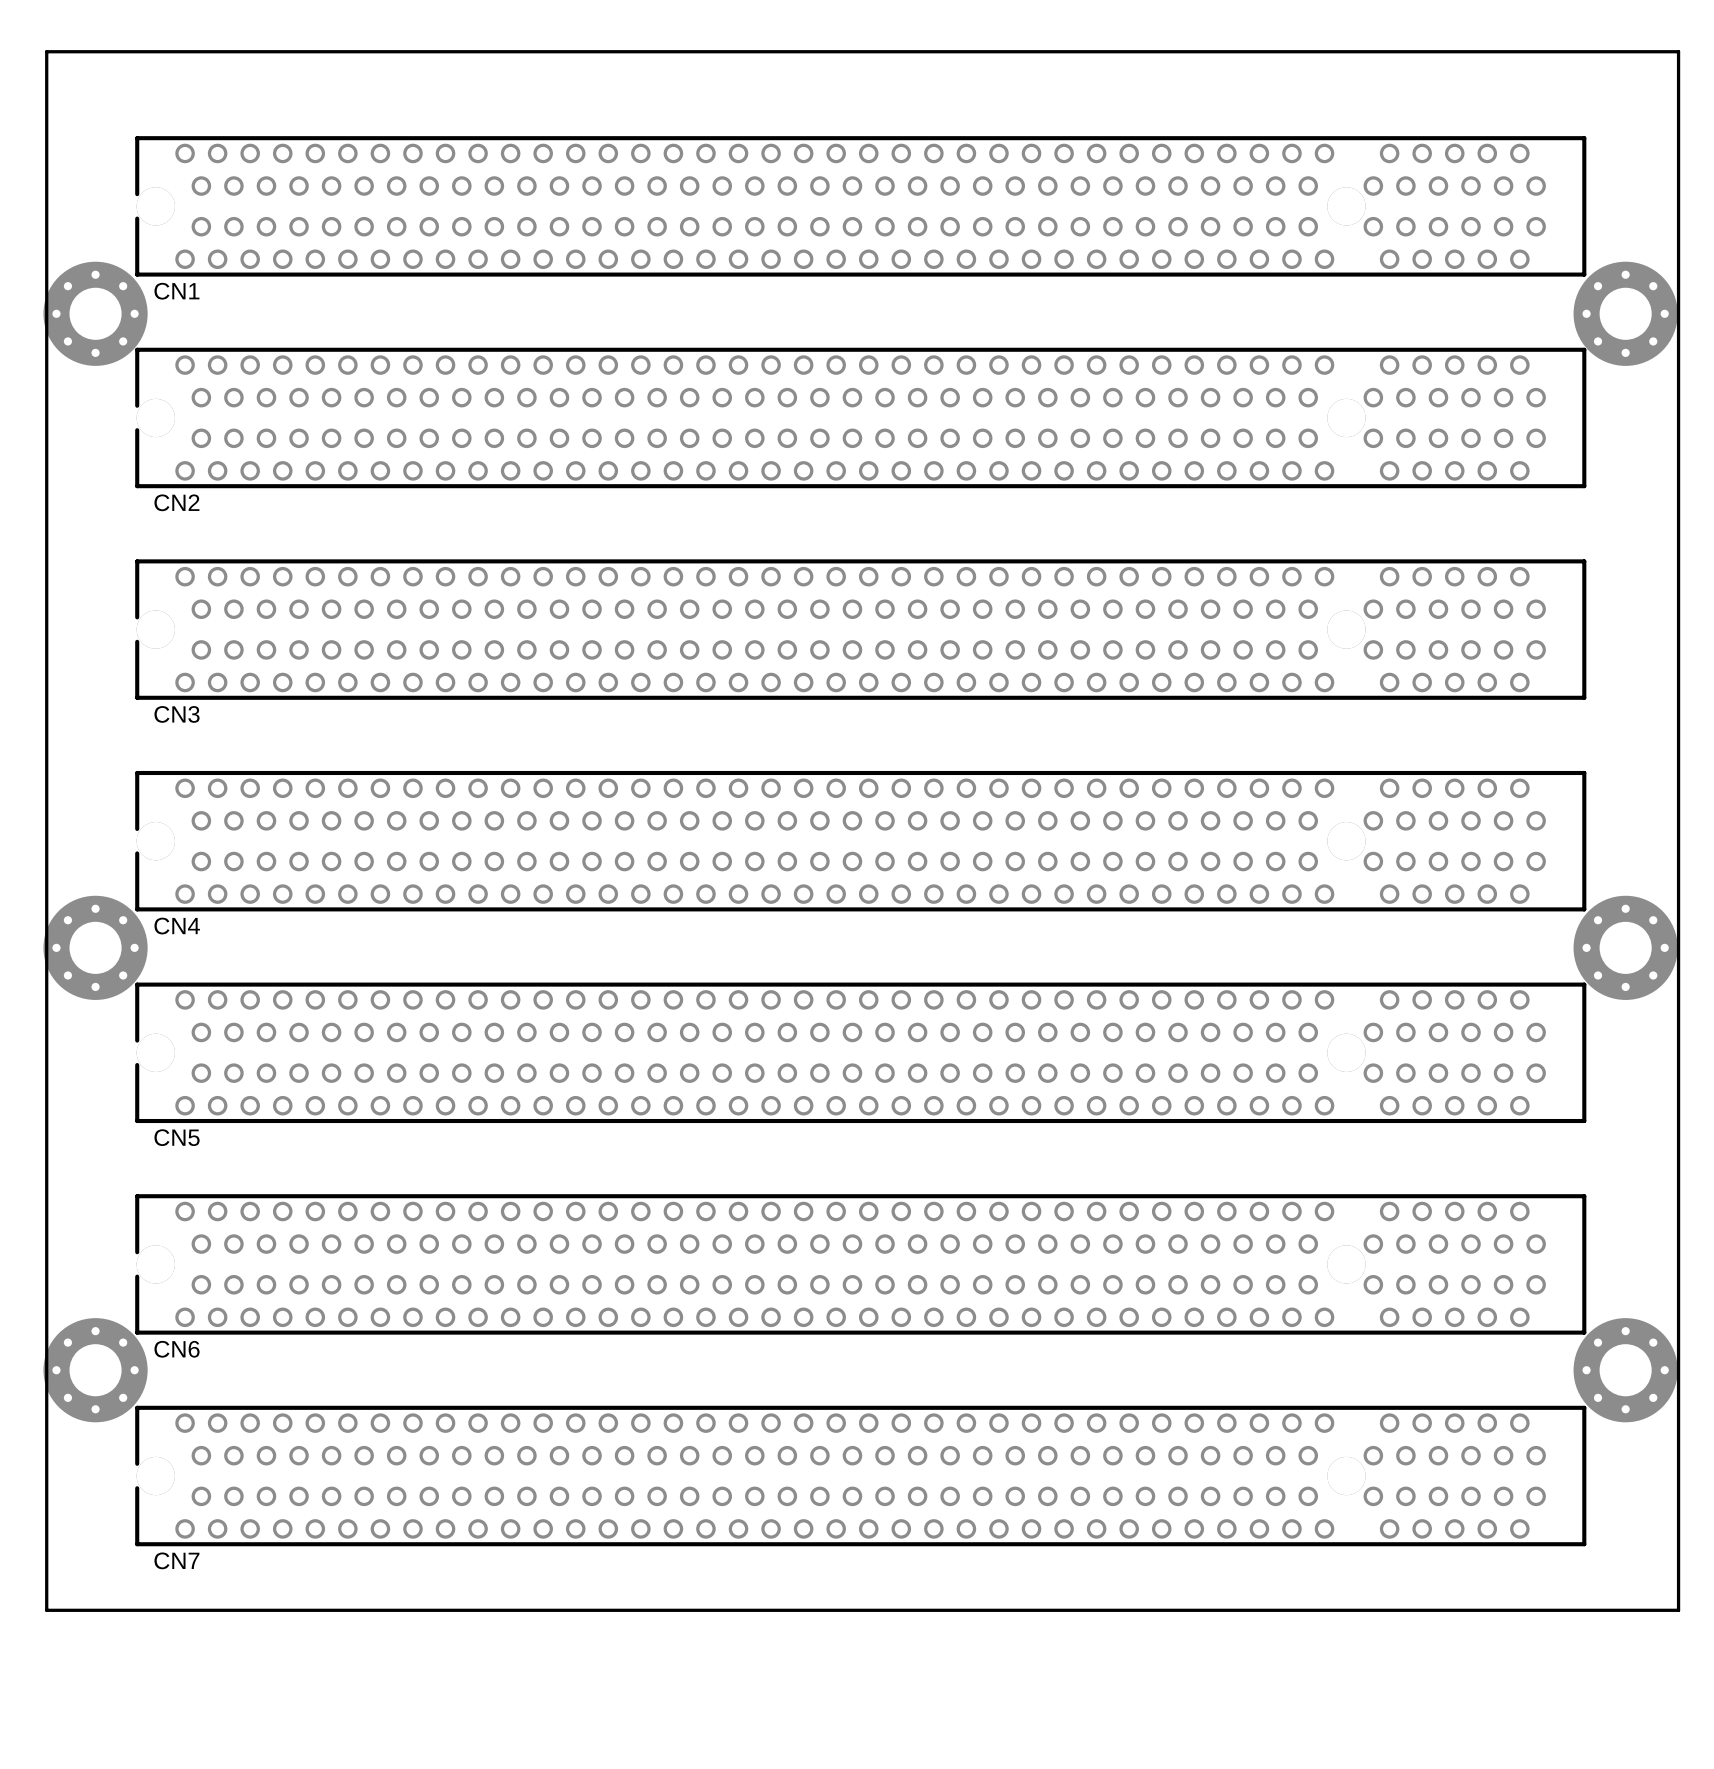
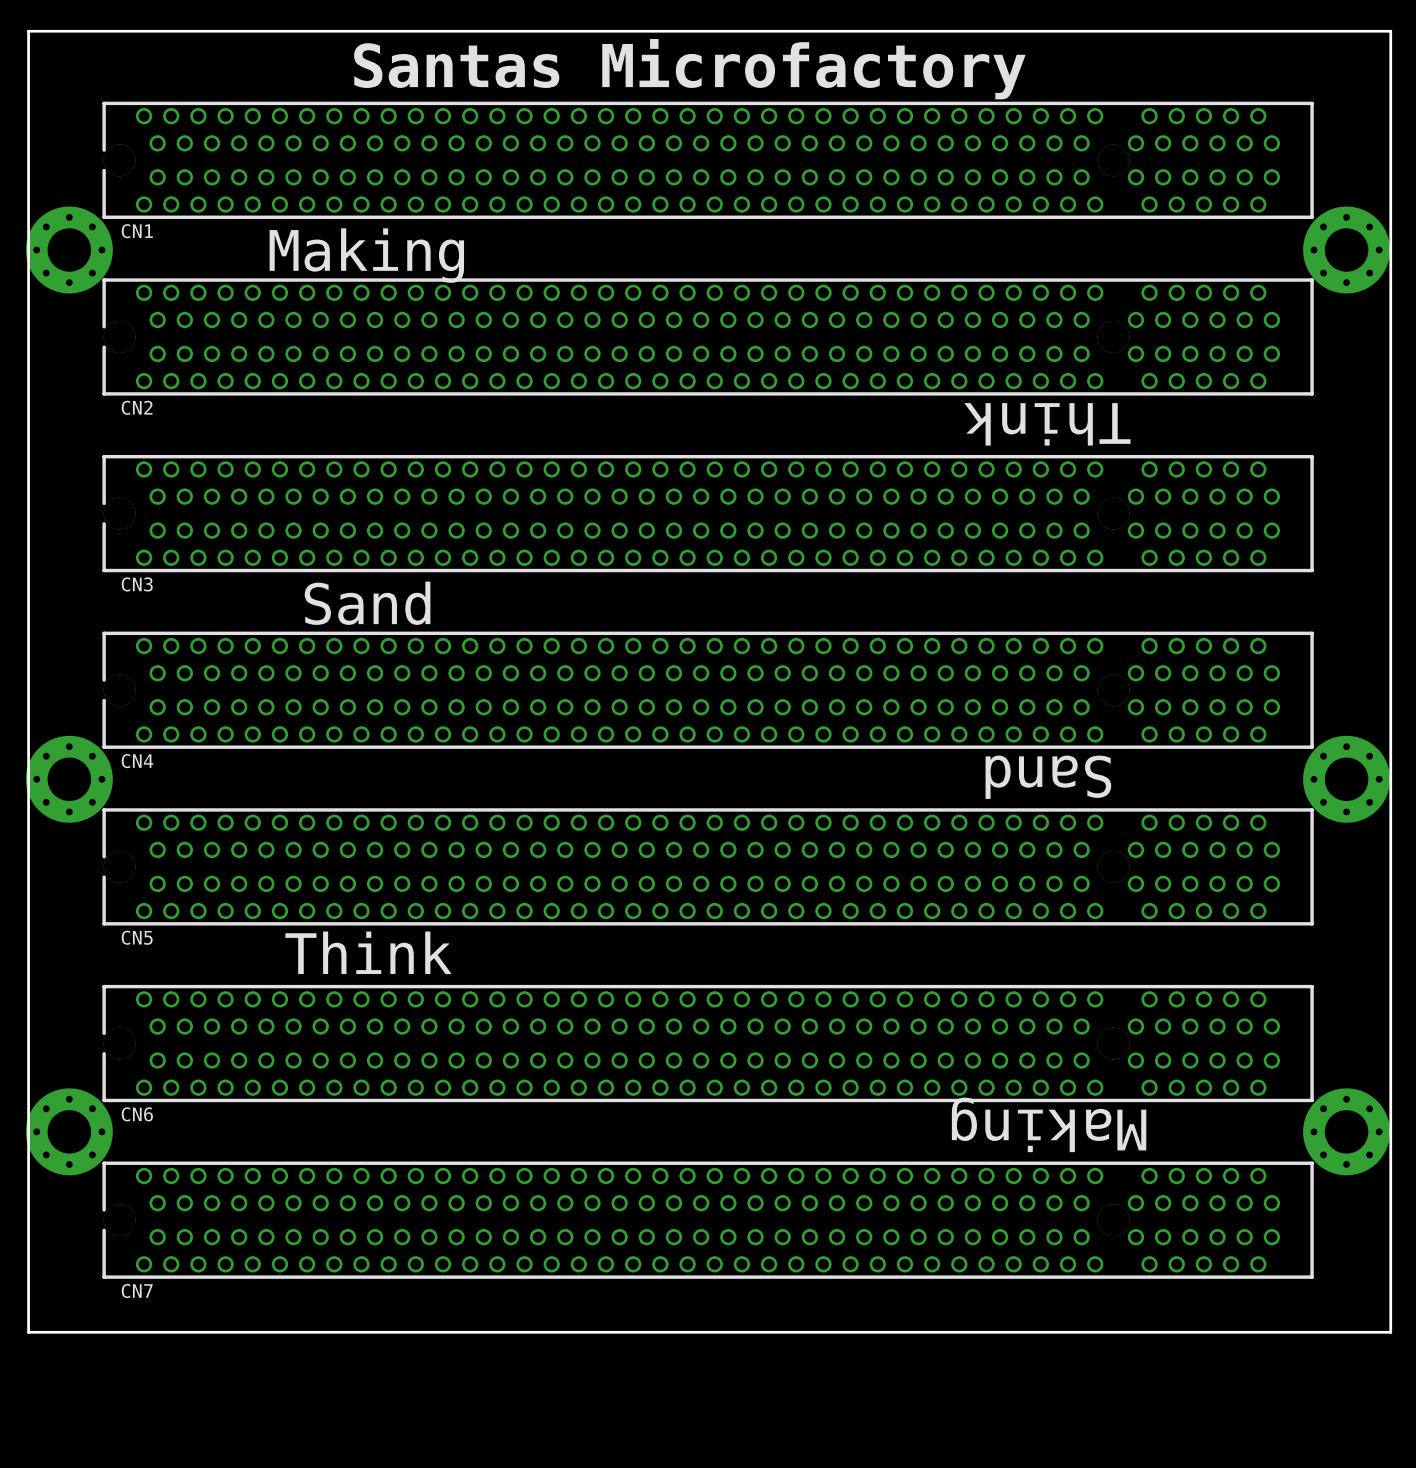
text: none -> Santas Microfactory (689, 69)
text: none -> Making (366, 255)
text: none -> Think (1047, 424)
text: none -> Sand (367, 603)
text: none -> Sand (1048, 777)
text: none -> Think (368, 952)
text: none -> Making (1049, 1124)

